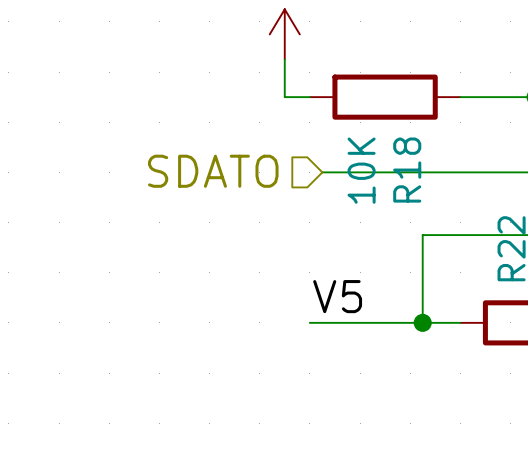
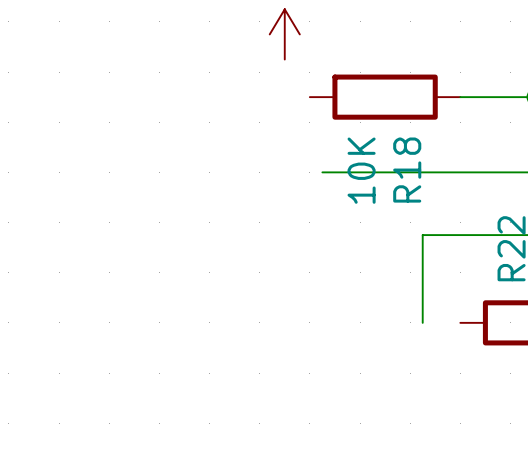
wire: (284, 59) (284, 97) (309, 97) -> none
hierarchical label: SDATO (213, 171) -> none
label: V5 (337, 296) -> none
wire: (309, 322) (460, 322) -> none
junction: (422, 322) -> none

